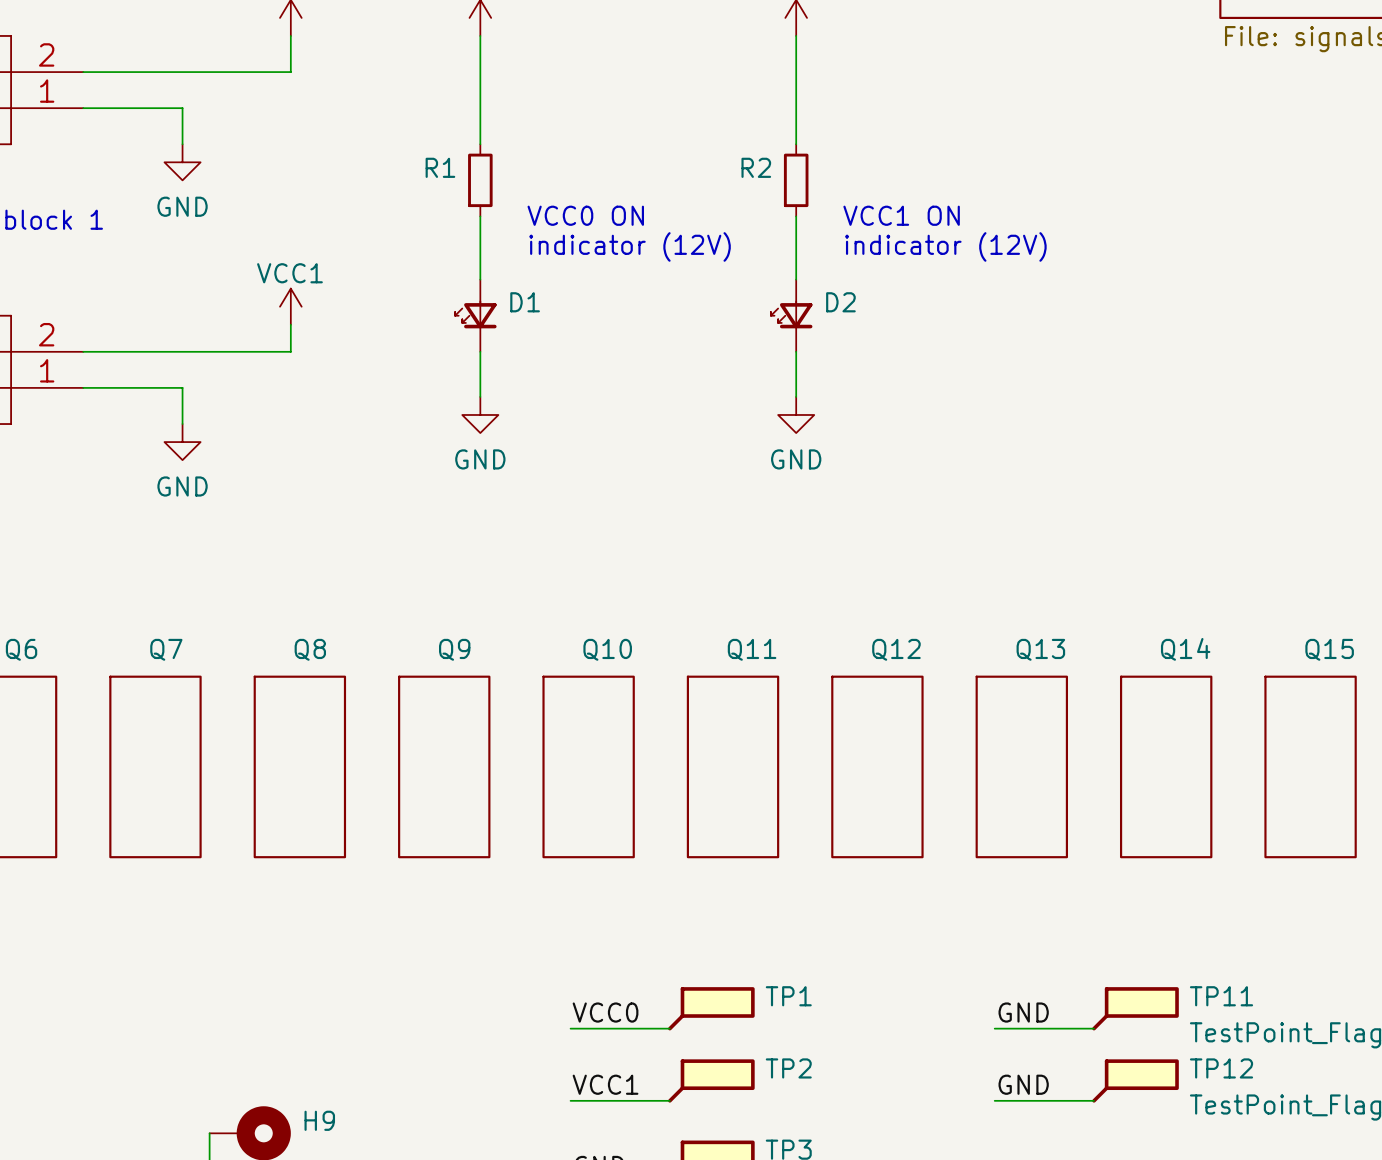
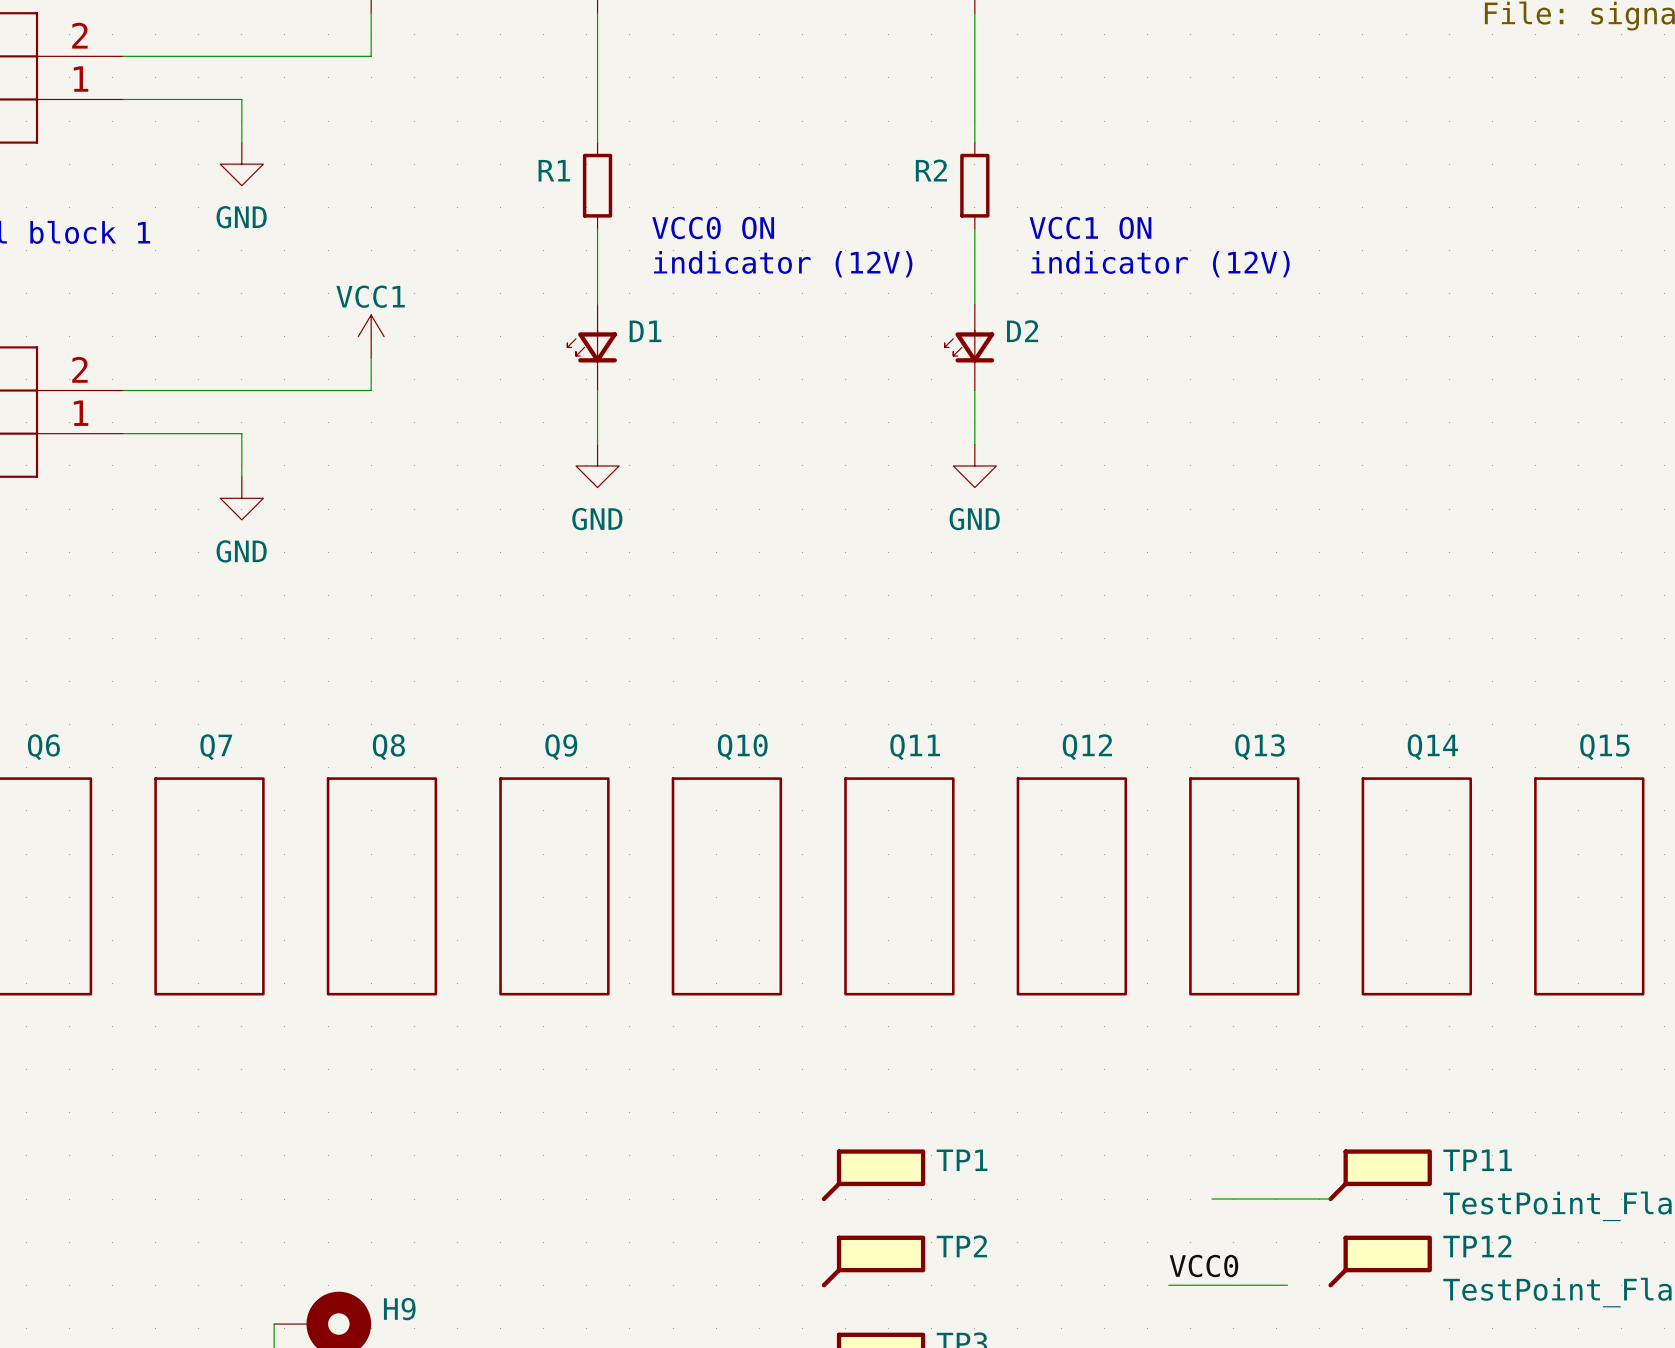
label: VCC0 (605, 1012) -> none
label: GND (1023, 1012) -> none
wire: (570, 1028) (669, 1028) -> none
label: VCC1 (605, 1084) -> none
label: none -> VCC0 (1203, 1266)
label: GND (1023, 1084) -> none
wire: (570, 1100) (669, 1100) -> none
wire: (1057, 1100) (1093, 1100) -> (1168, 1285) (1211, 1285)

